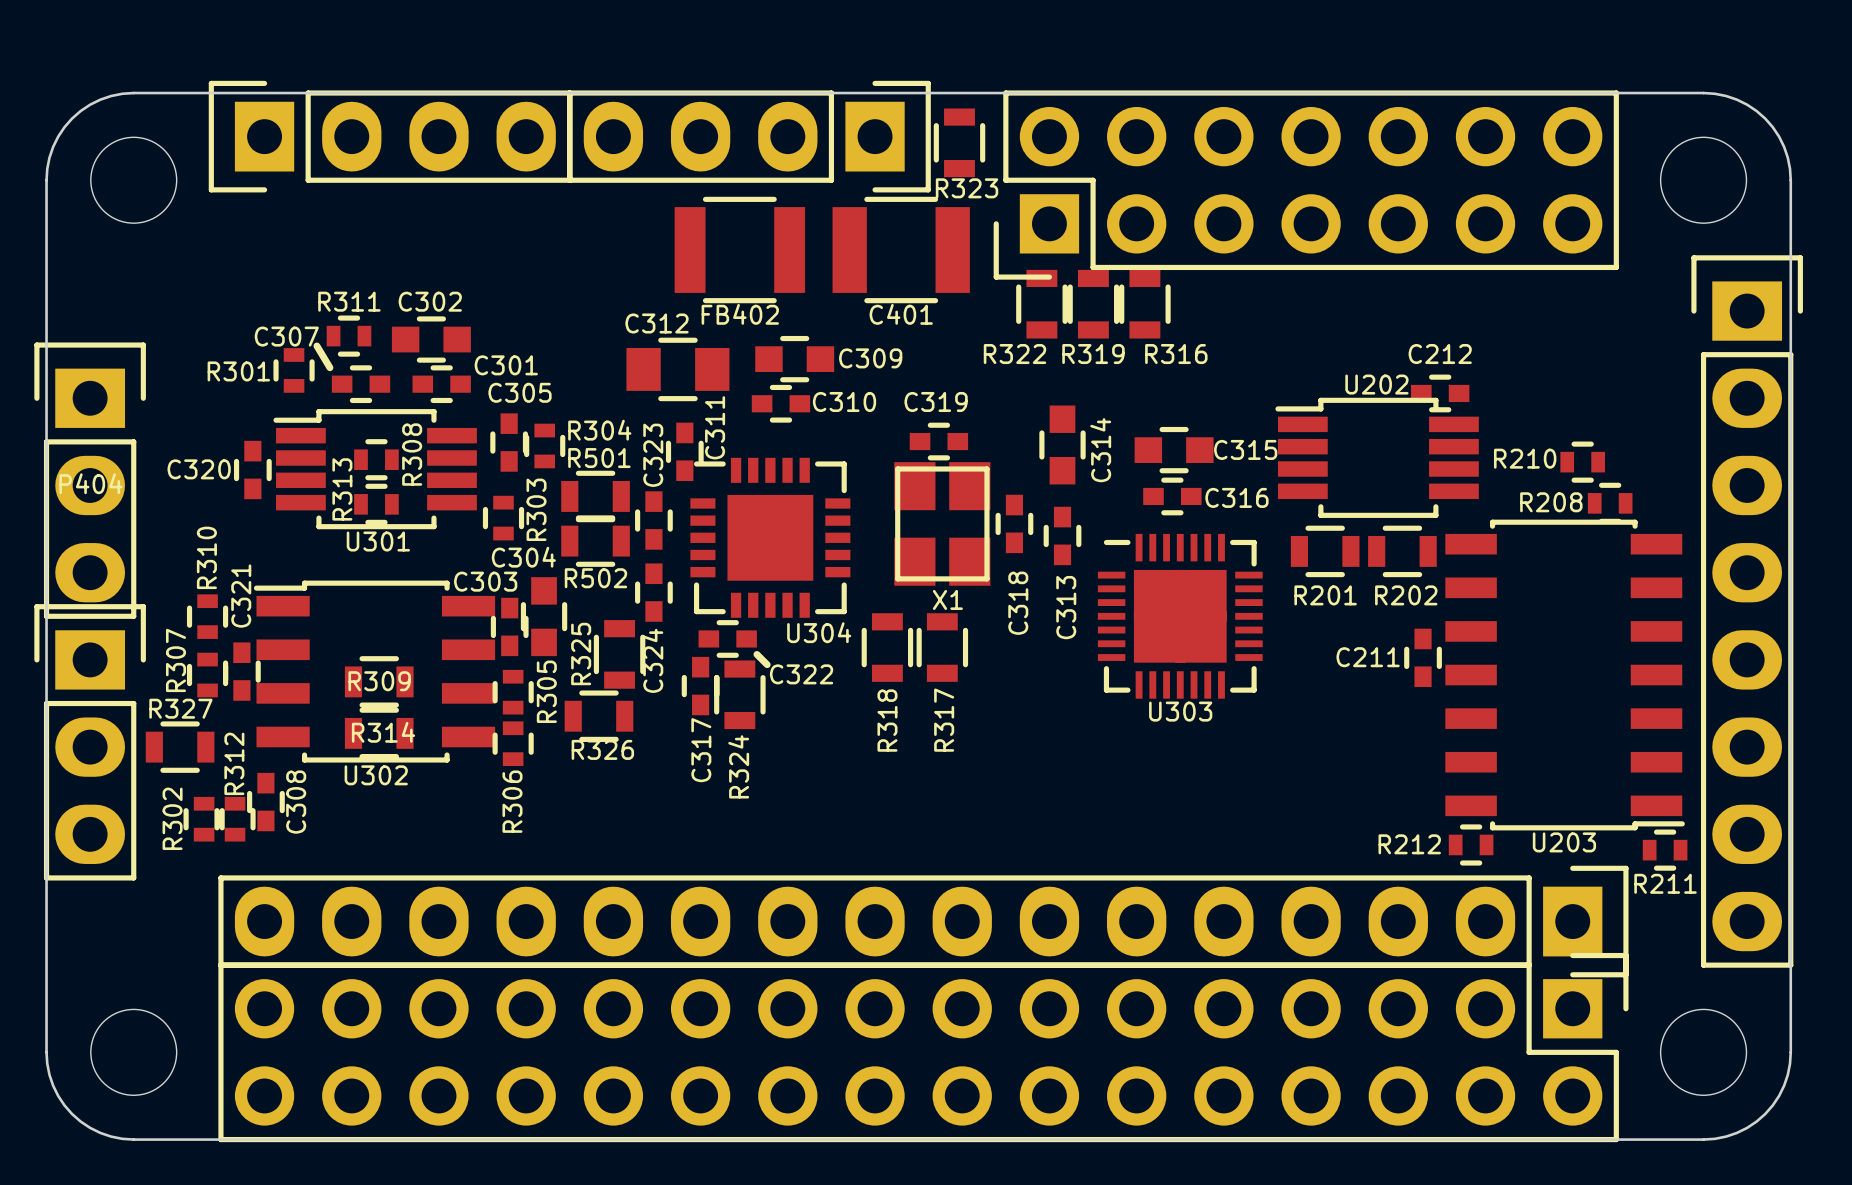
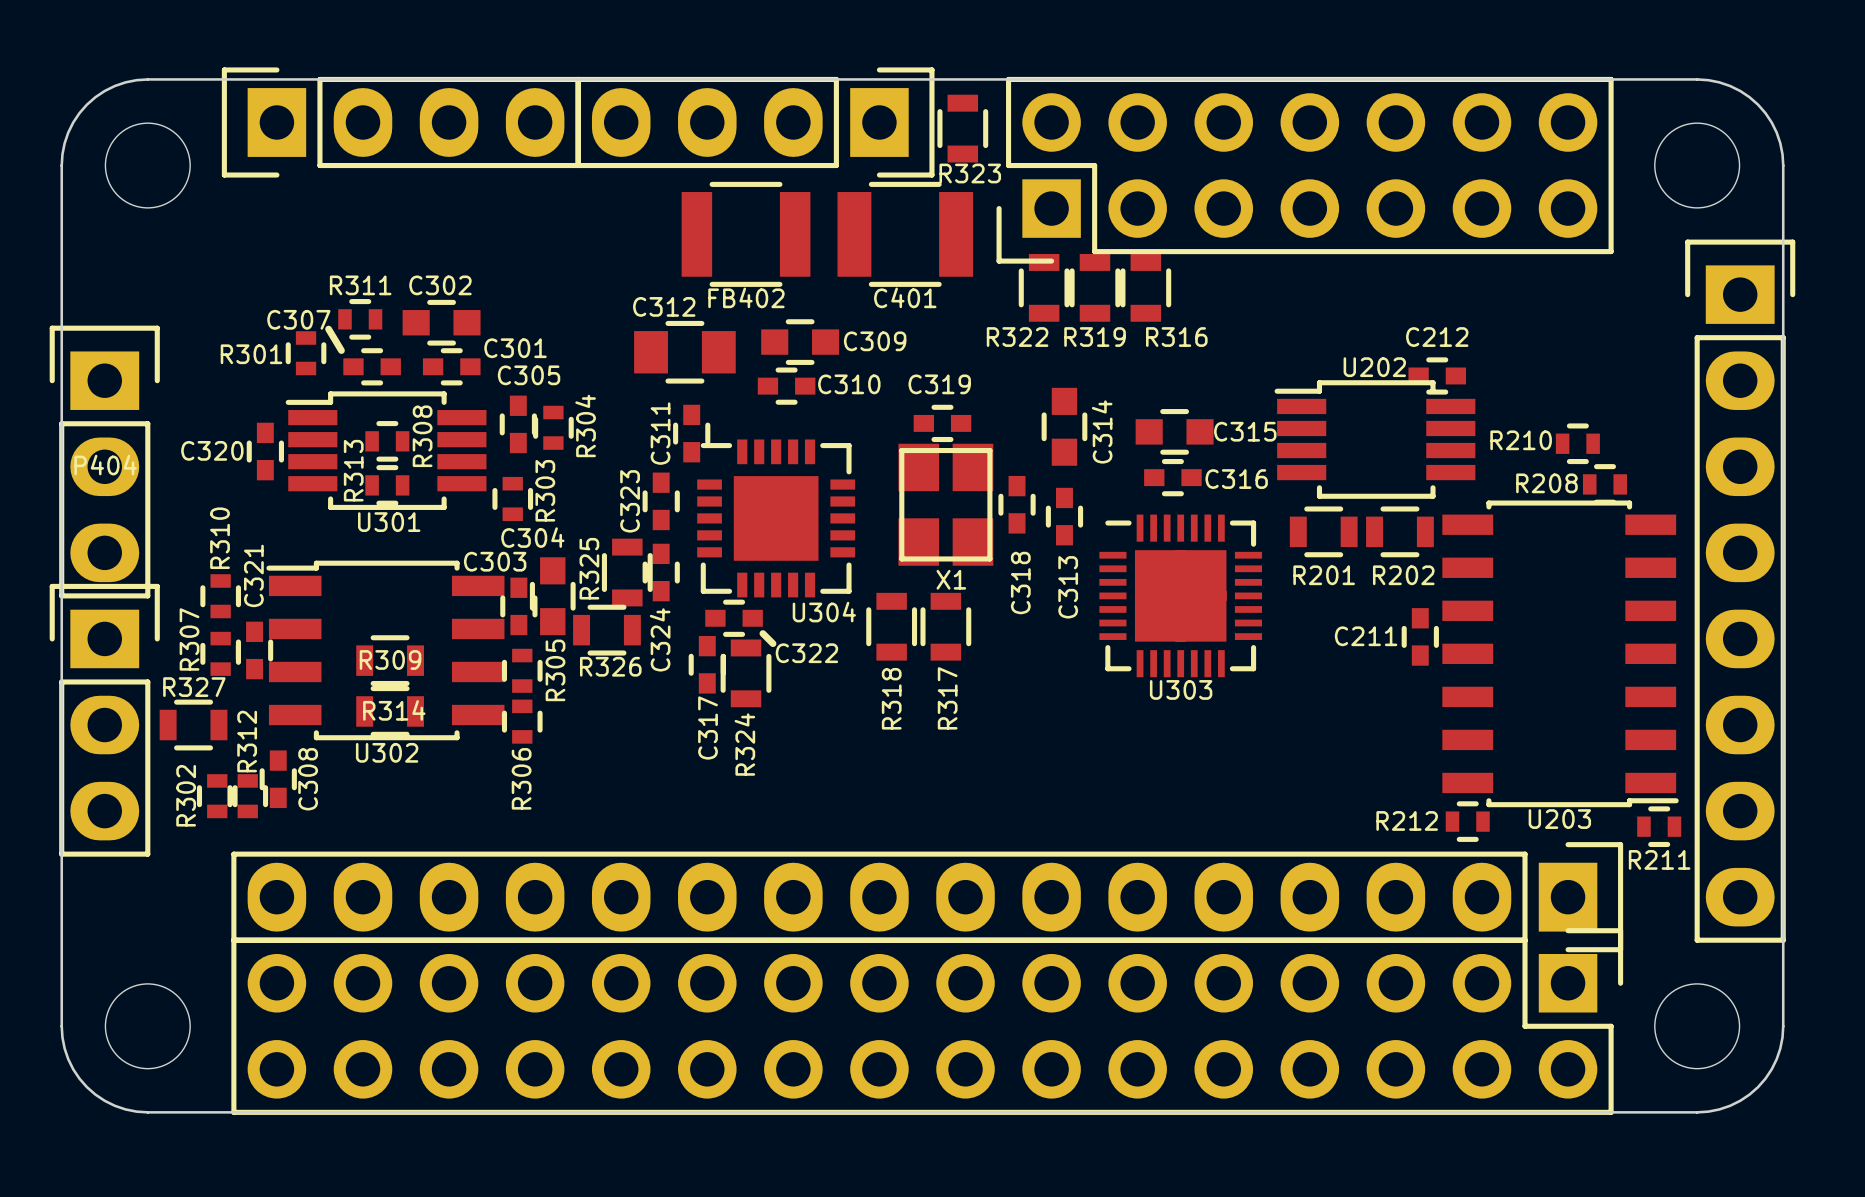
C311 name position: C311 (715, 427) -> C311 (660, 433)
R304 name rotation: 0° (599, 430) -> 90° counterclockwise (585, 425)
C323 name position: C323 (653, 455) -> C323 (630, 501)
R501: (595, 496) -> none
R502: (595, 541) -> none
R326 position: (619, 654) -> (627, 572)
R325 position: (598, 716) -> (606, 630)

